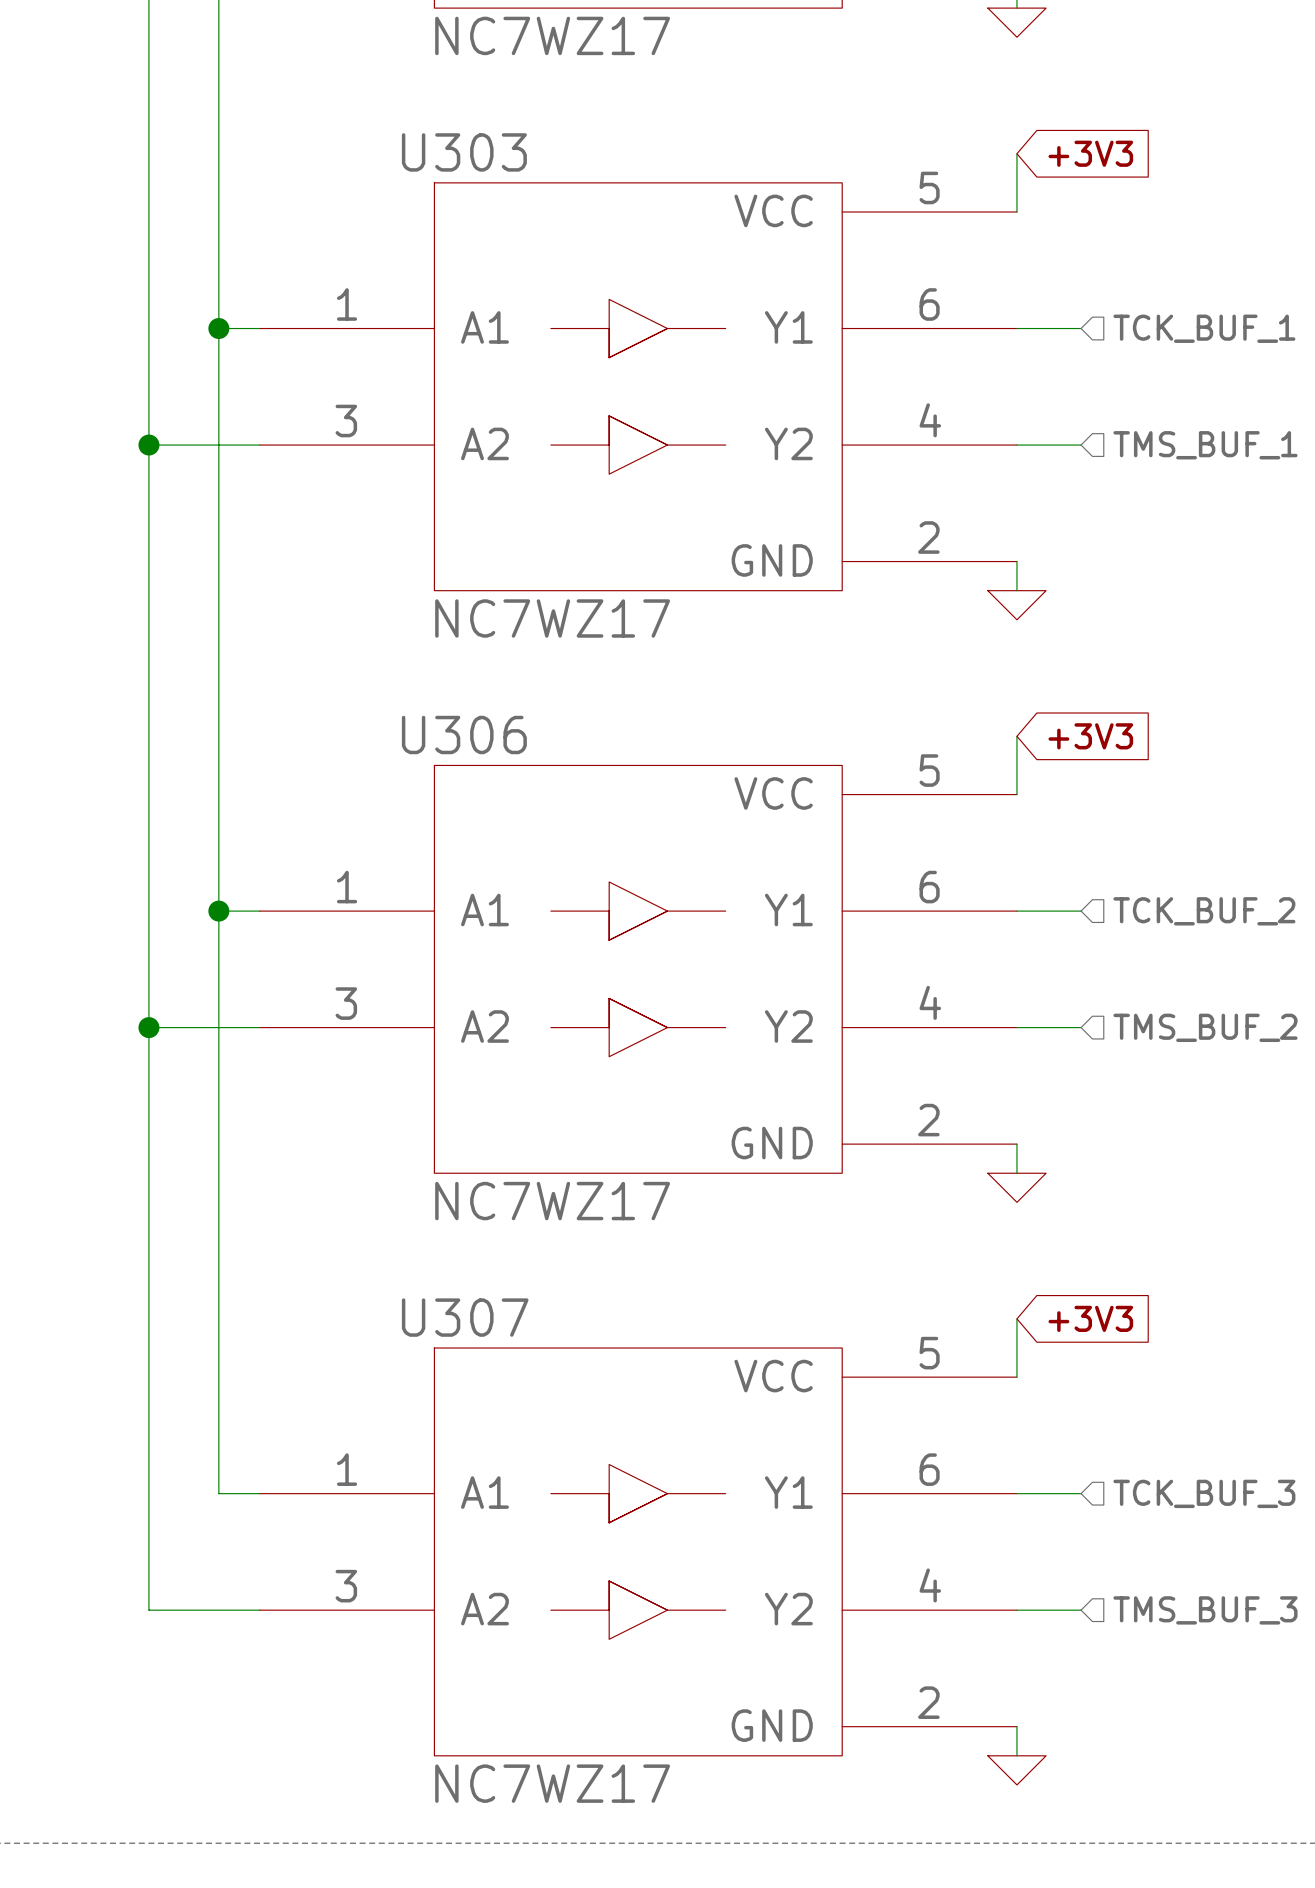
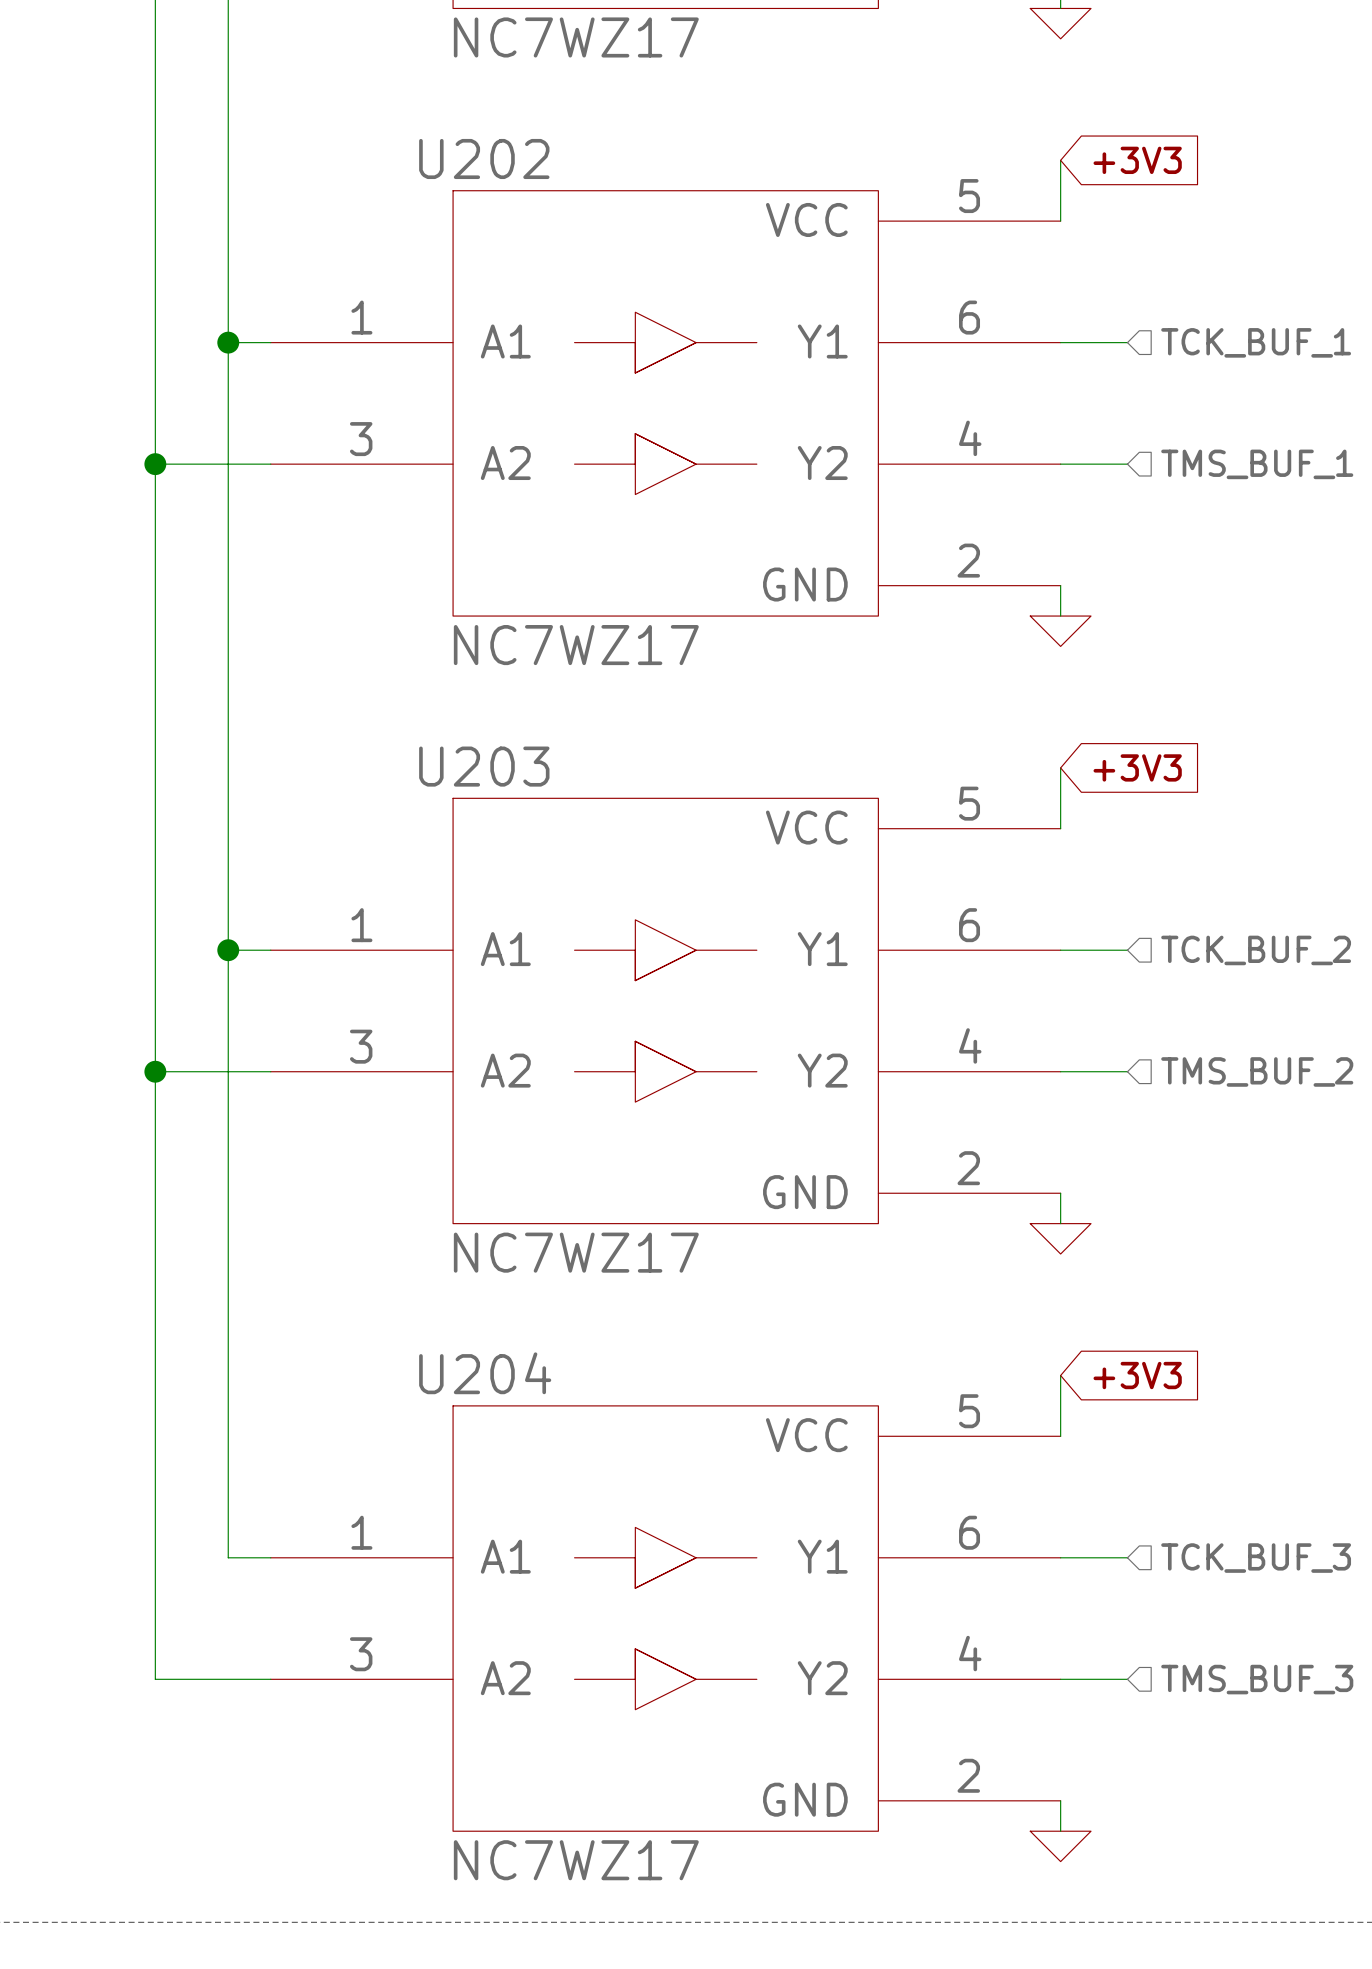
U303 name: U303 (464, 152) -> U202 (484, 158)
U306 name: U306 (464, 735) -> U203 (484, 766)
U307 name: U307 (465, 1317) -> U204 (485, 1373)

